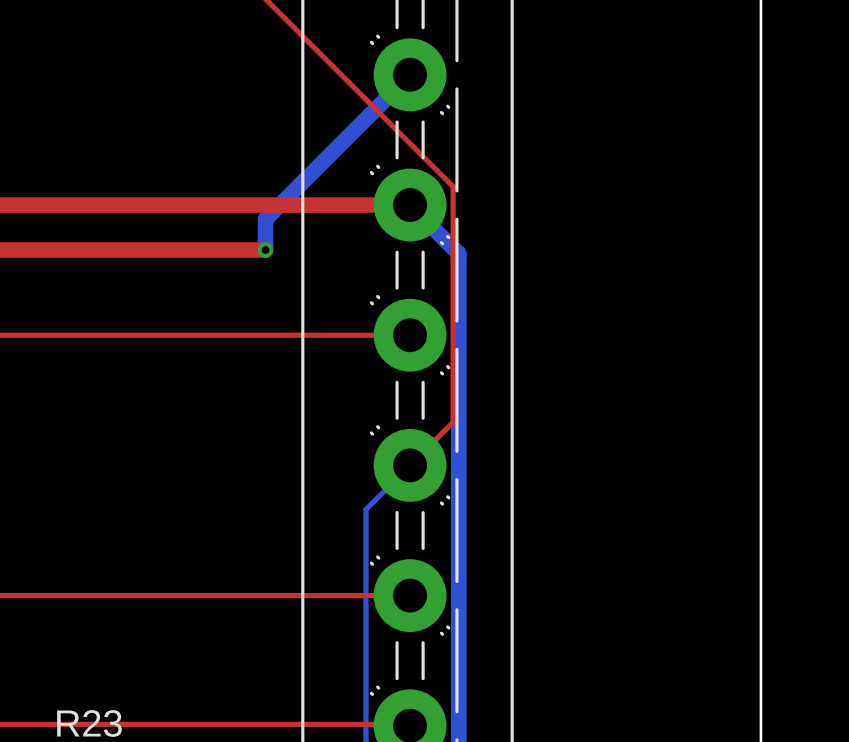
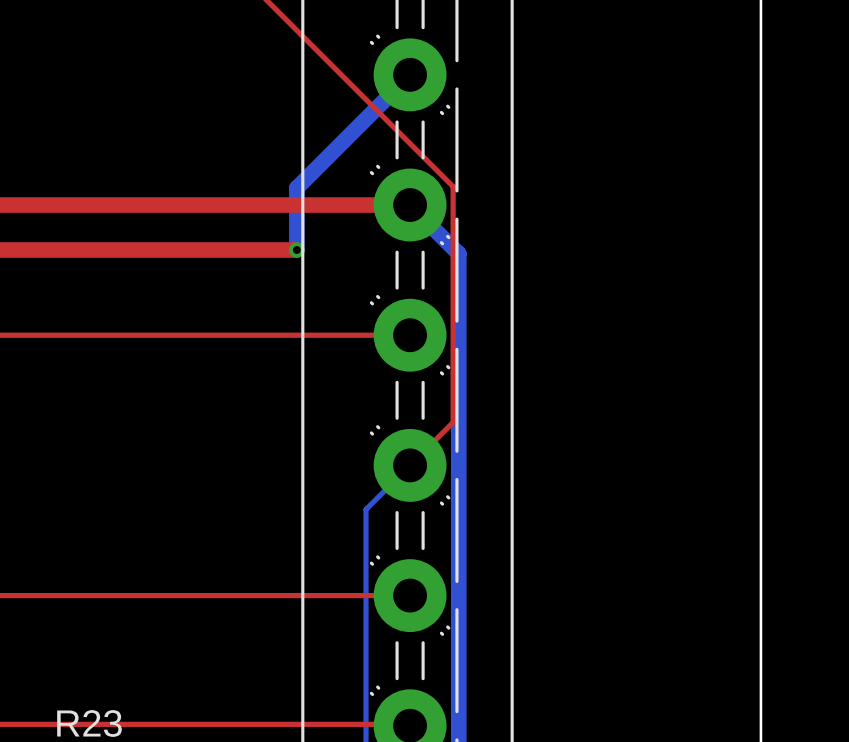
bottom track: (296, 188) (265, 219) (265, 250) -> (296, 188) (296, 250)
top track: none -> (265, 250) (296, 250)
via position: (265, 250) -> (296, 250)

